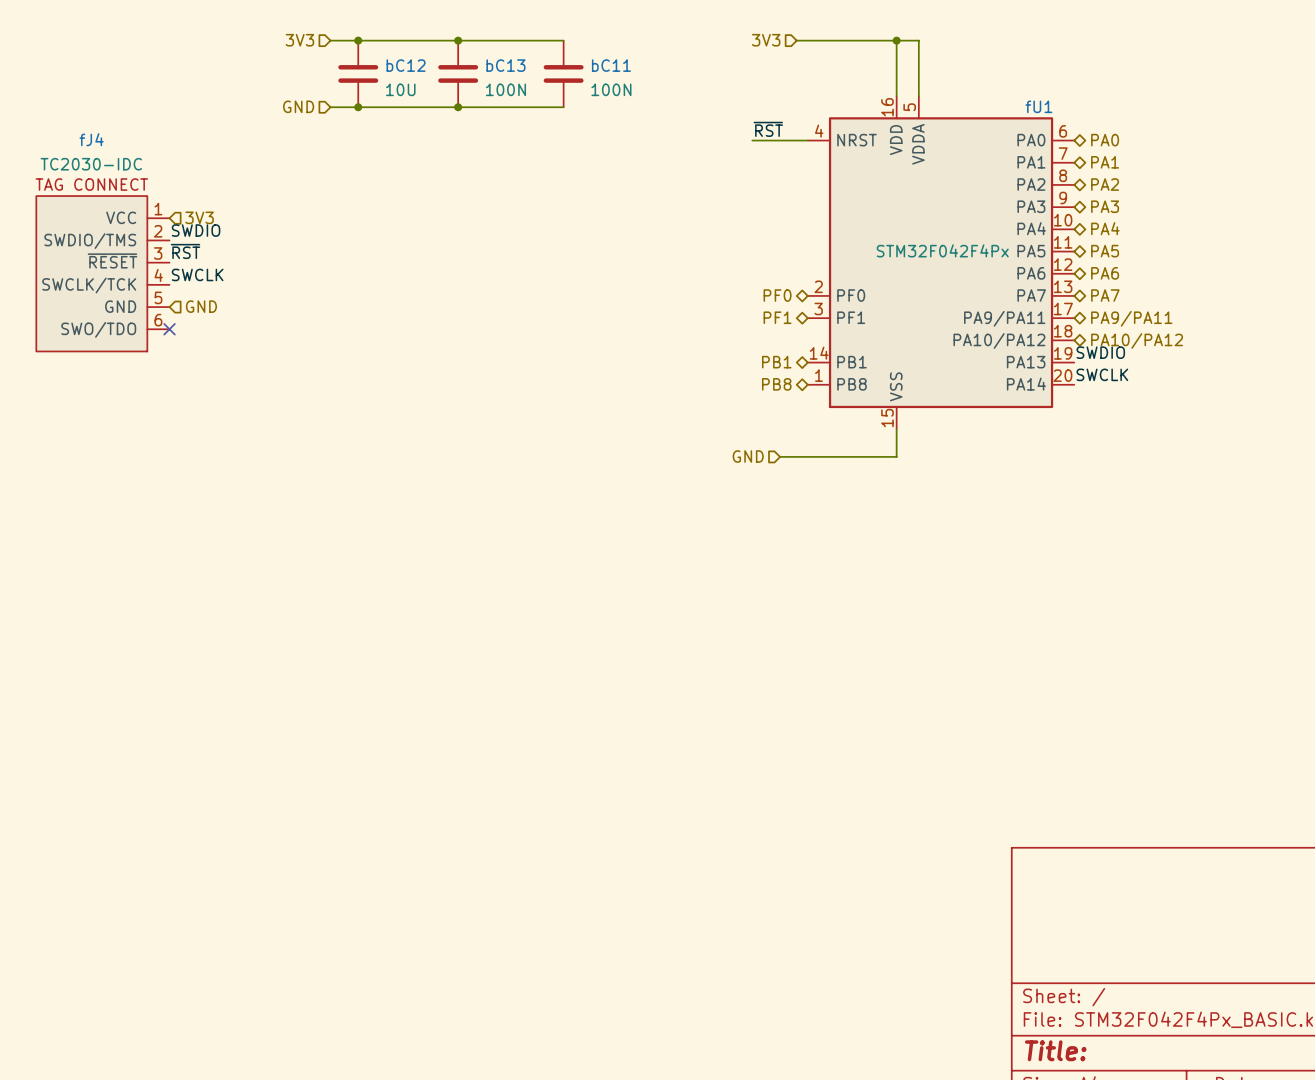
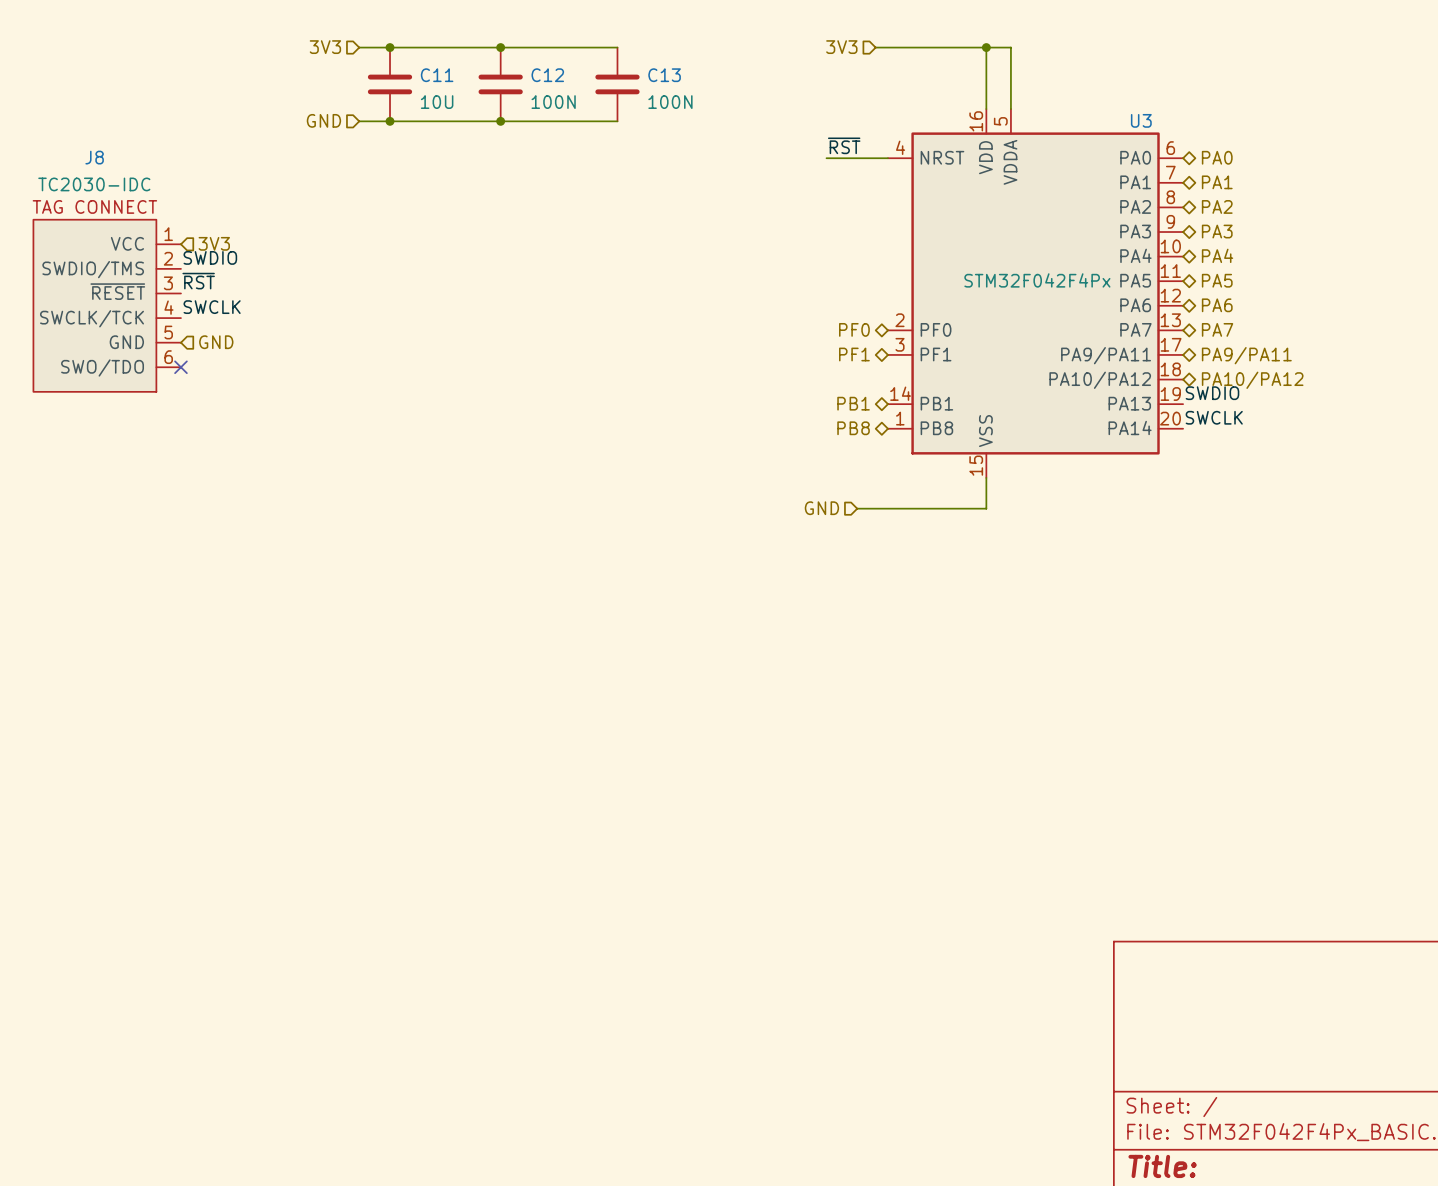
bC12 name: bC12 (406, 65) -> C11 (437, 75)
bC13 name: bC13 (505, 65) -> C12 (547, 75)
bC11 name: bC11 (611, 65) -> C13 (664, 75)
fU1 name: fU1 (1038, 106) -> U3 (1141, 120)
fJ4 name: fJ4 (91, 139) -> J8 (94, 157)

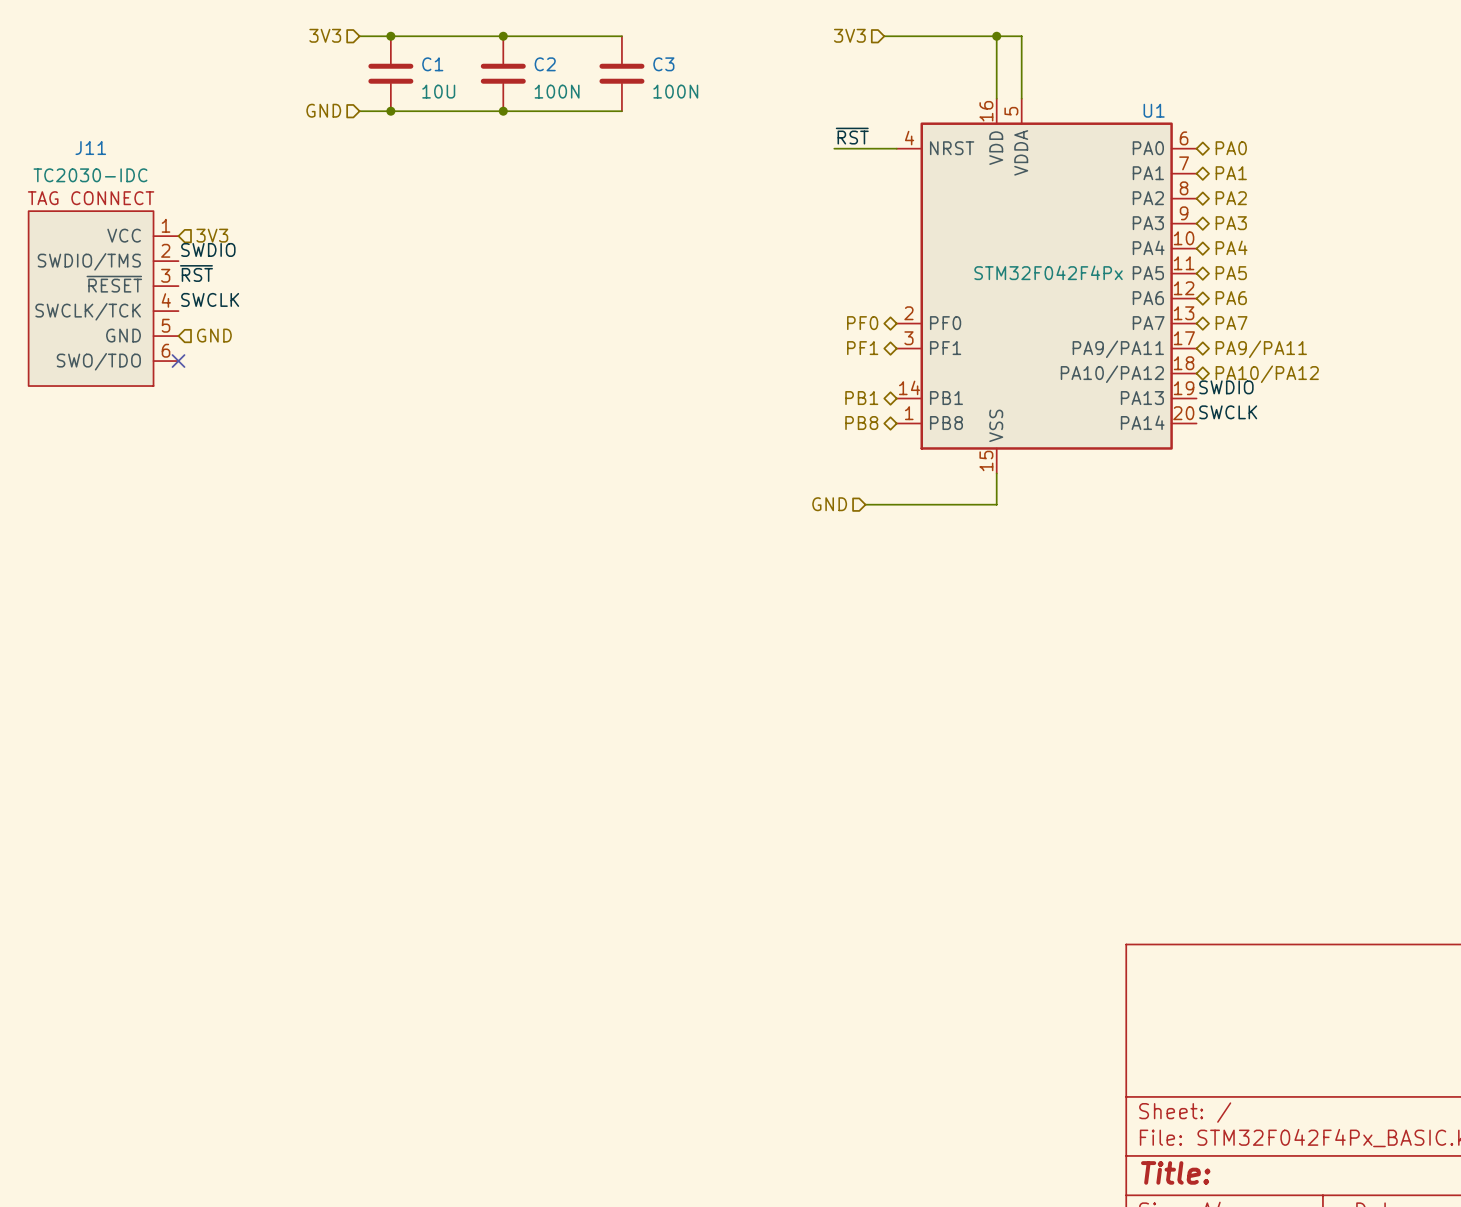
C11 name: C11 (437, 75) -> C1 (432, 64)
C12 name: C12 (547, 75) -> C2 (545, 64)
C13 name: C13 (664, 75) -> C3 (663, 64)
U3 name: U3 (1141, 120) -> U1 (1154, 110)
J8 name: J8 (94, 157) -> J11 (90, 148)

